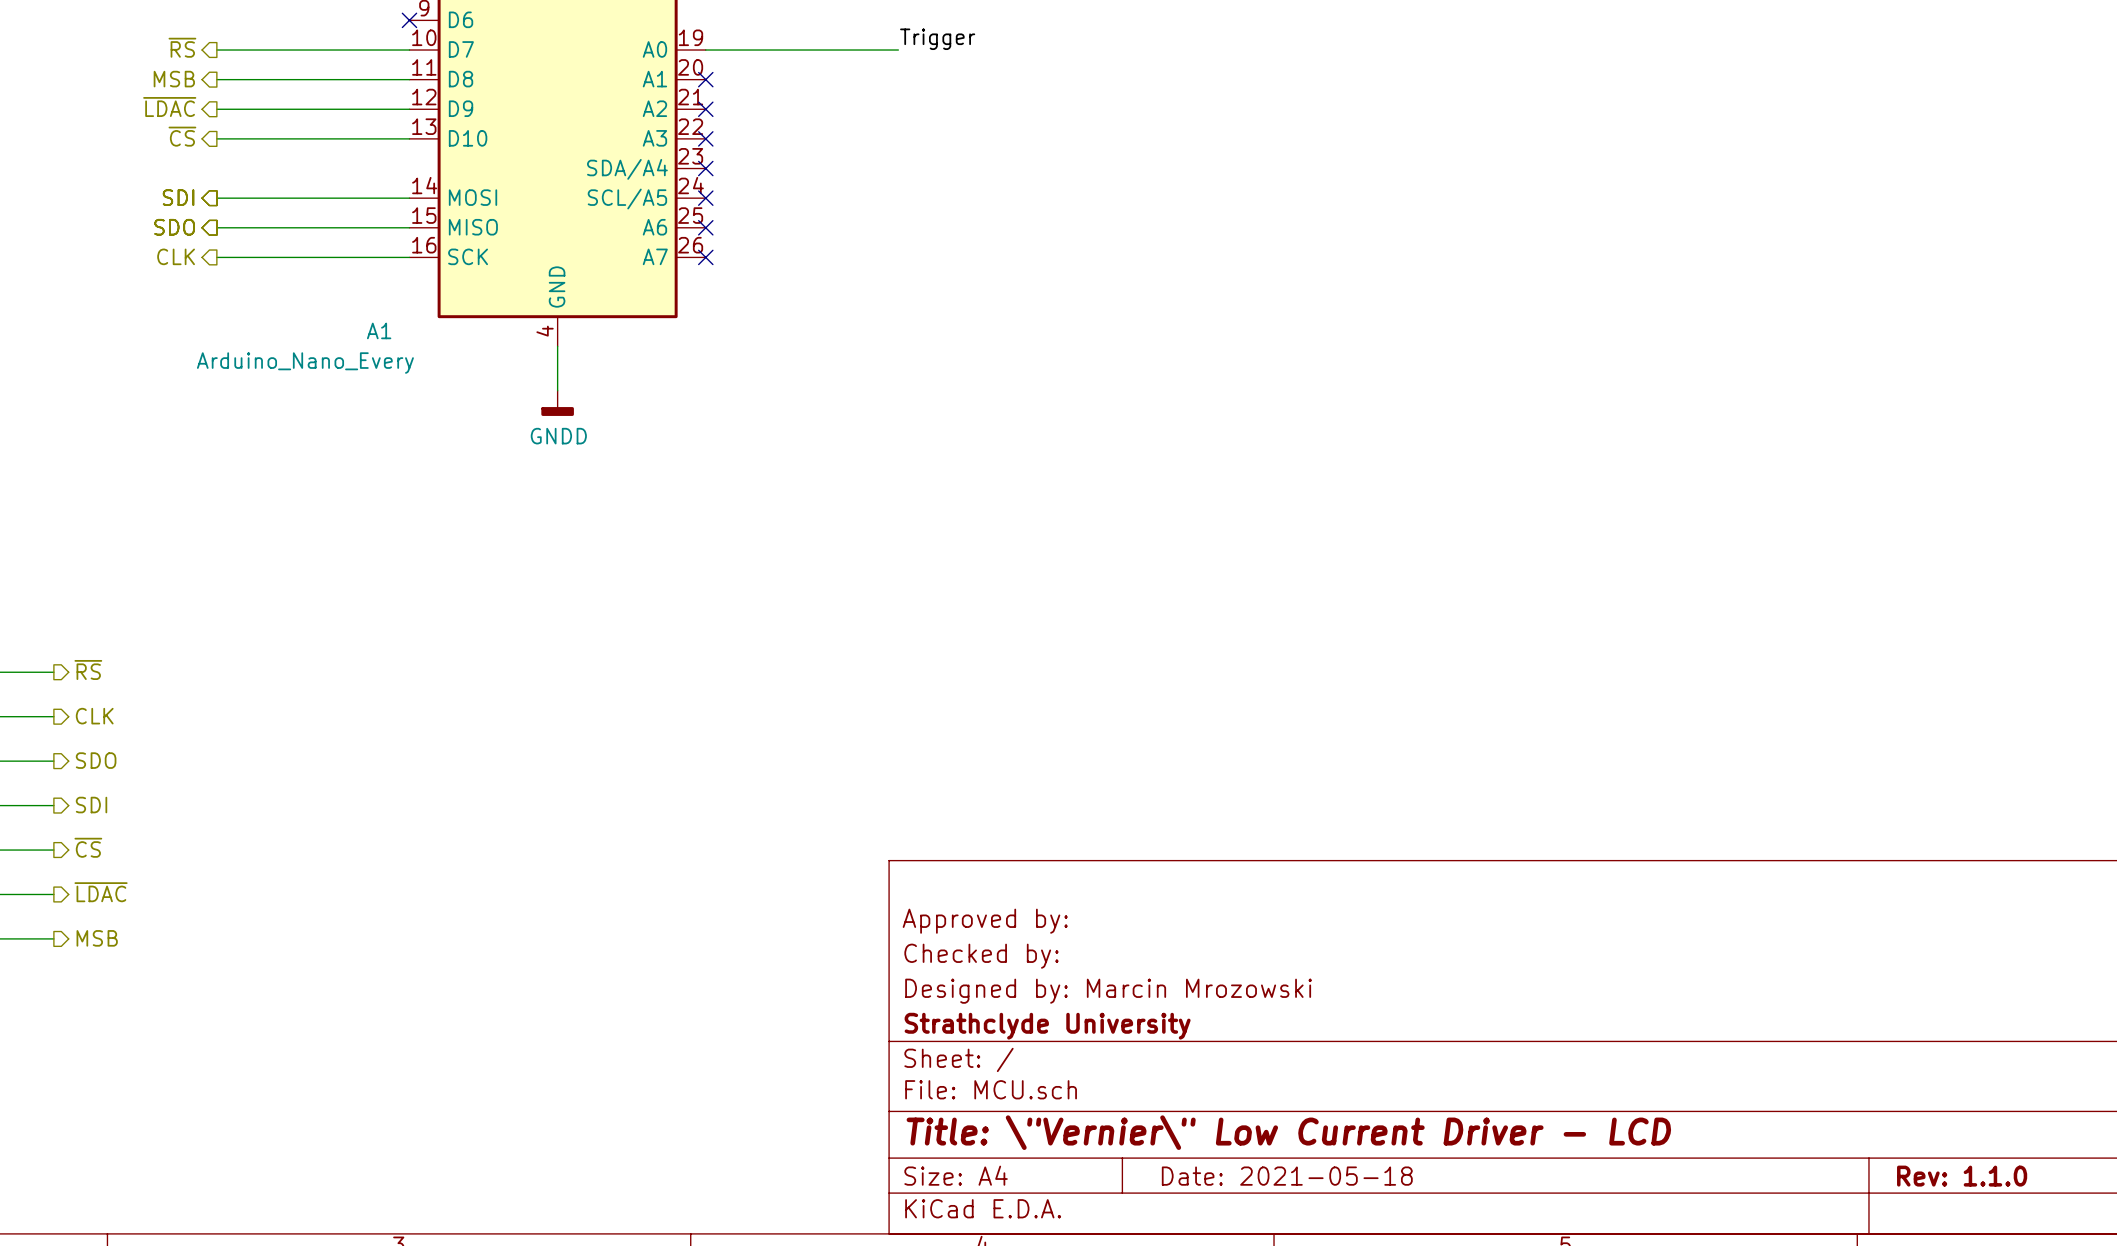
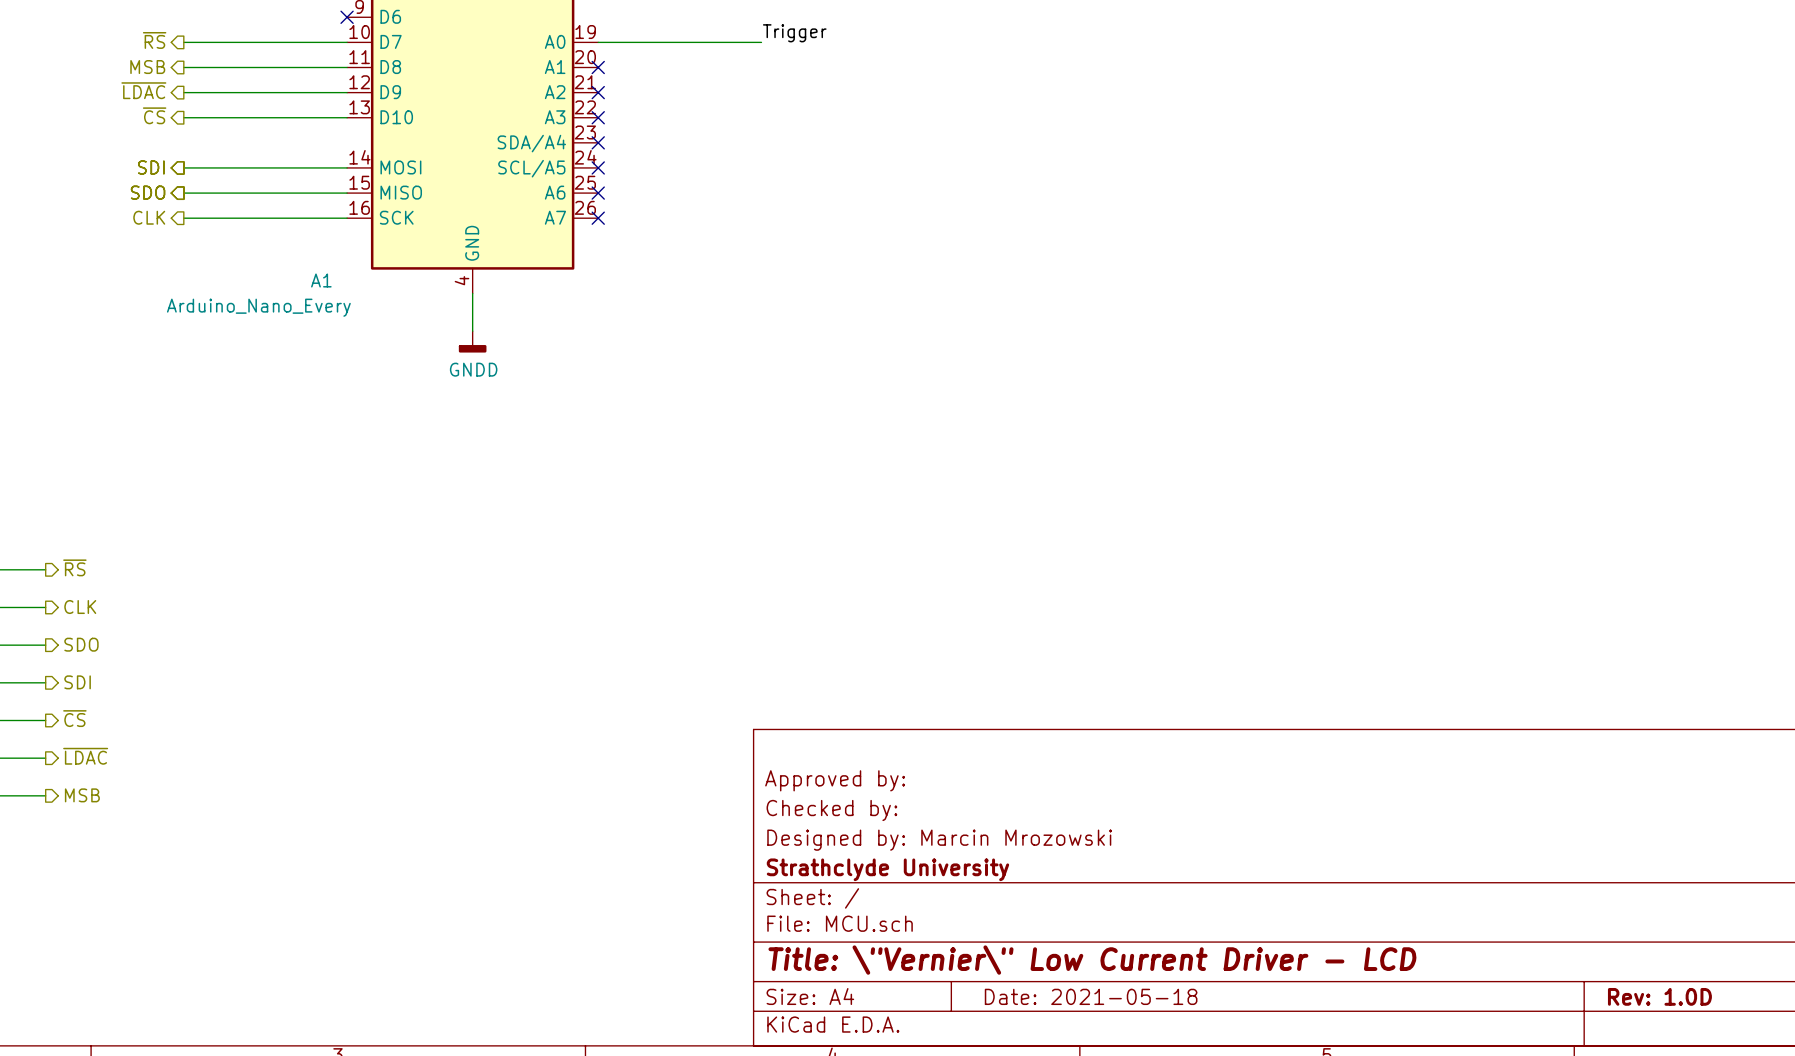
title block: Rev: 1.1.0 (1962, 1176) -> Rev: 1.0D (1659, 996)

